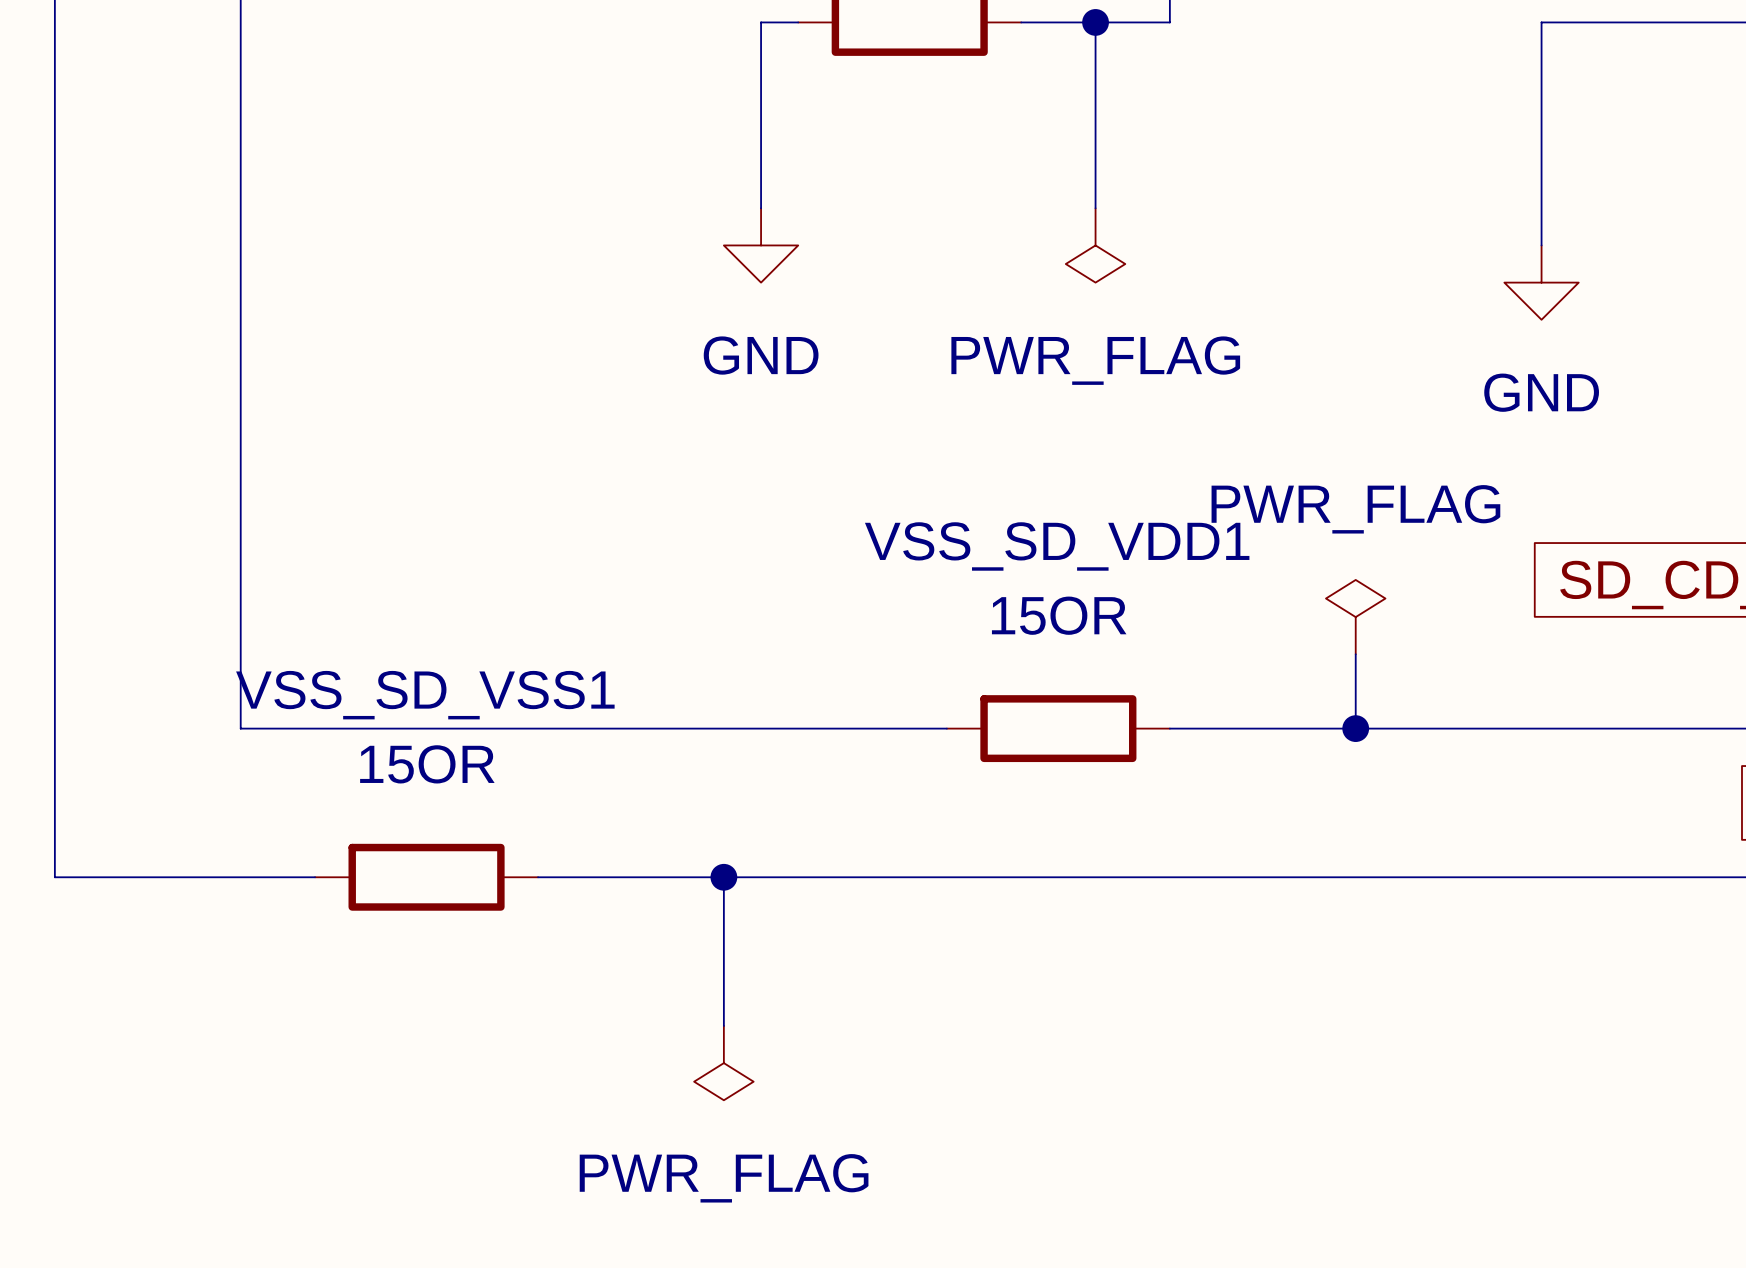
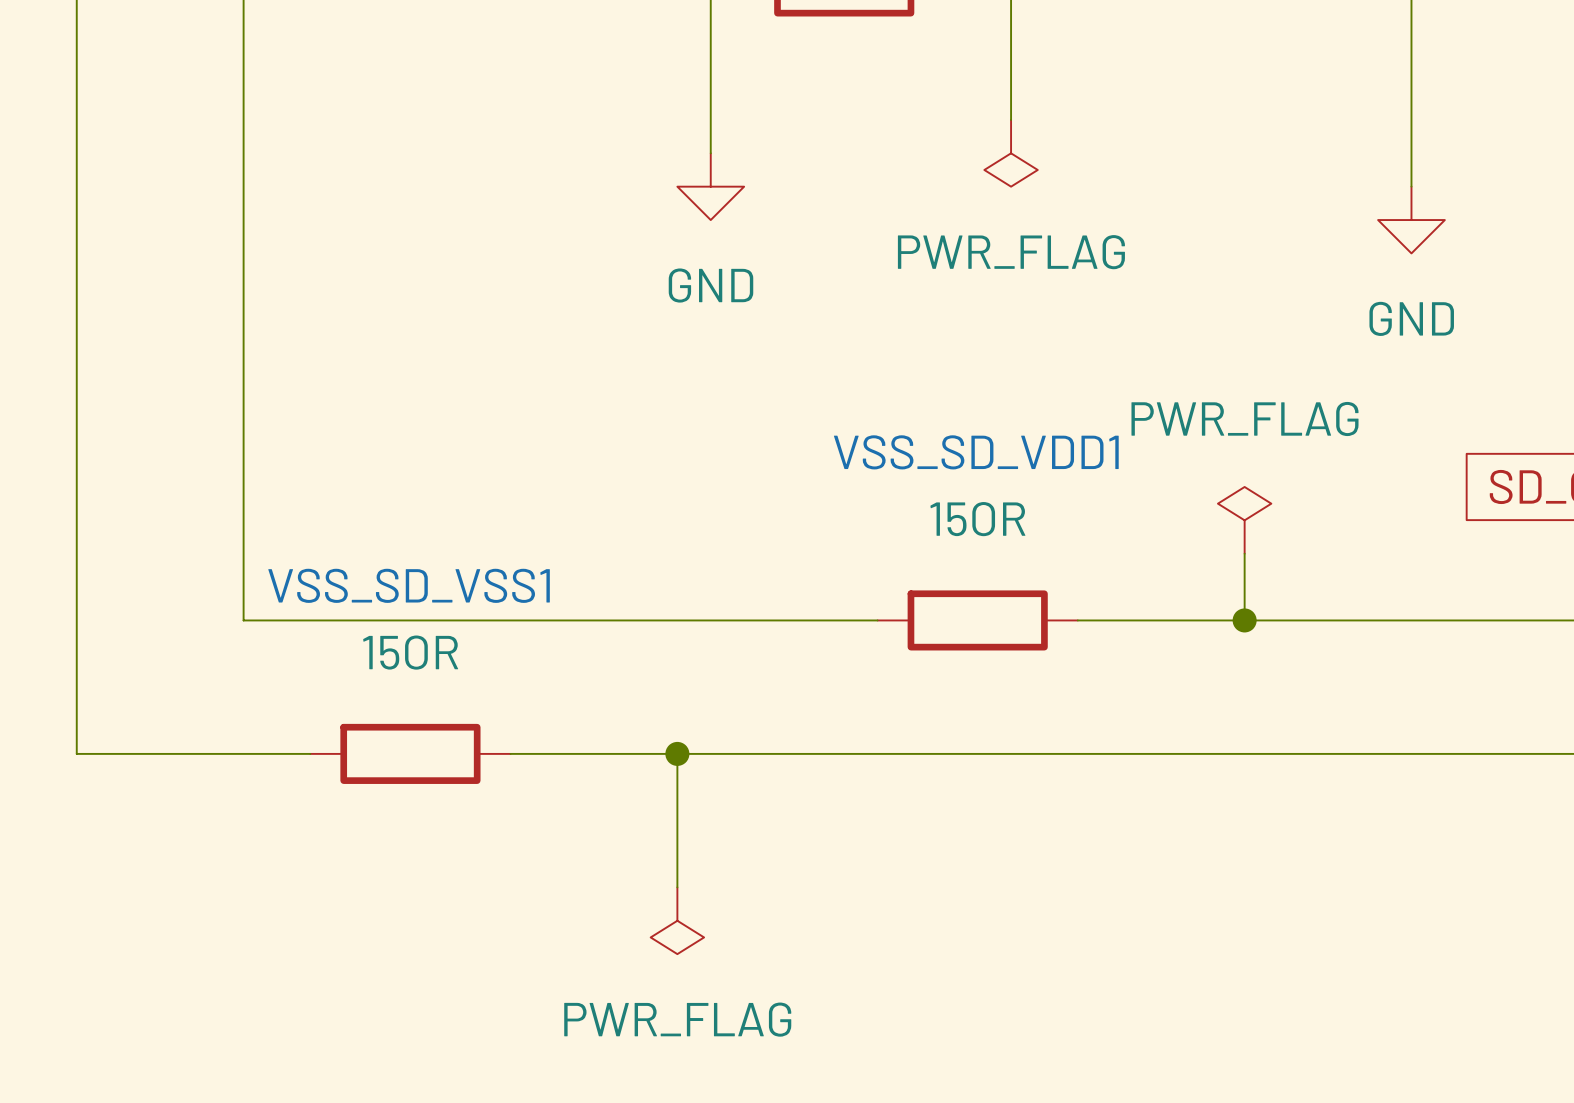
power symbol position: PWR_FLAG (1095, 245) -> PWR_FLAG (1011, 153)

